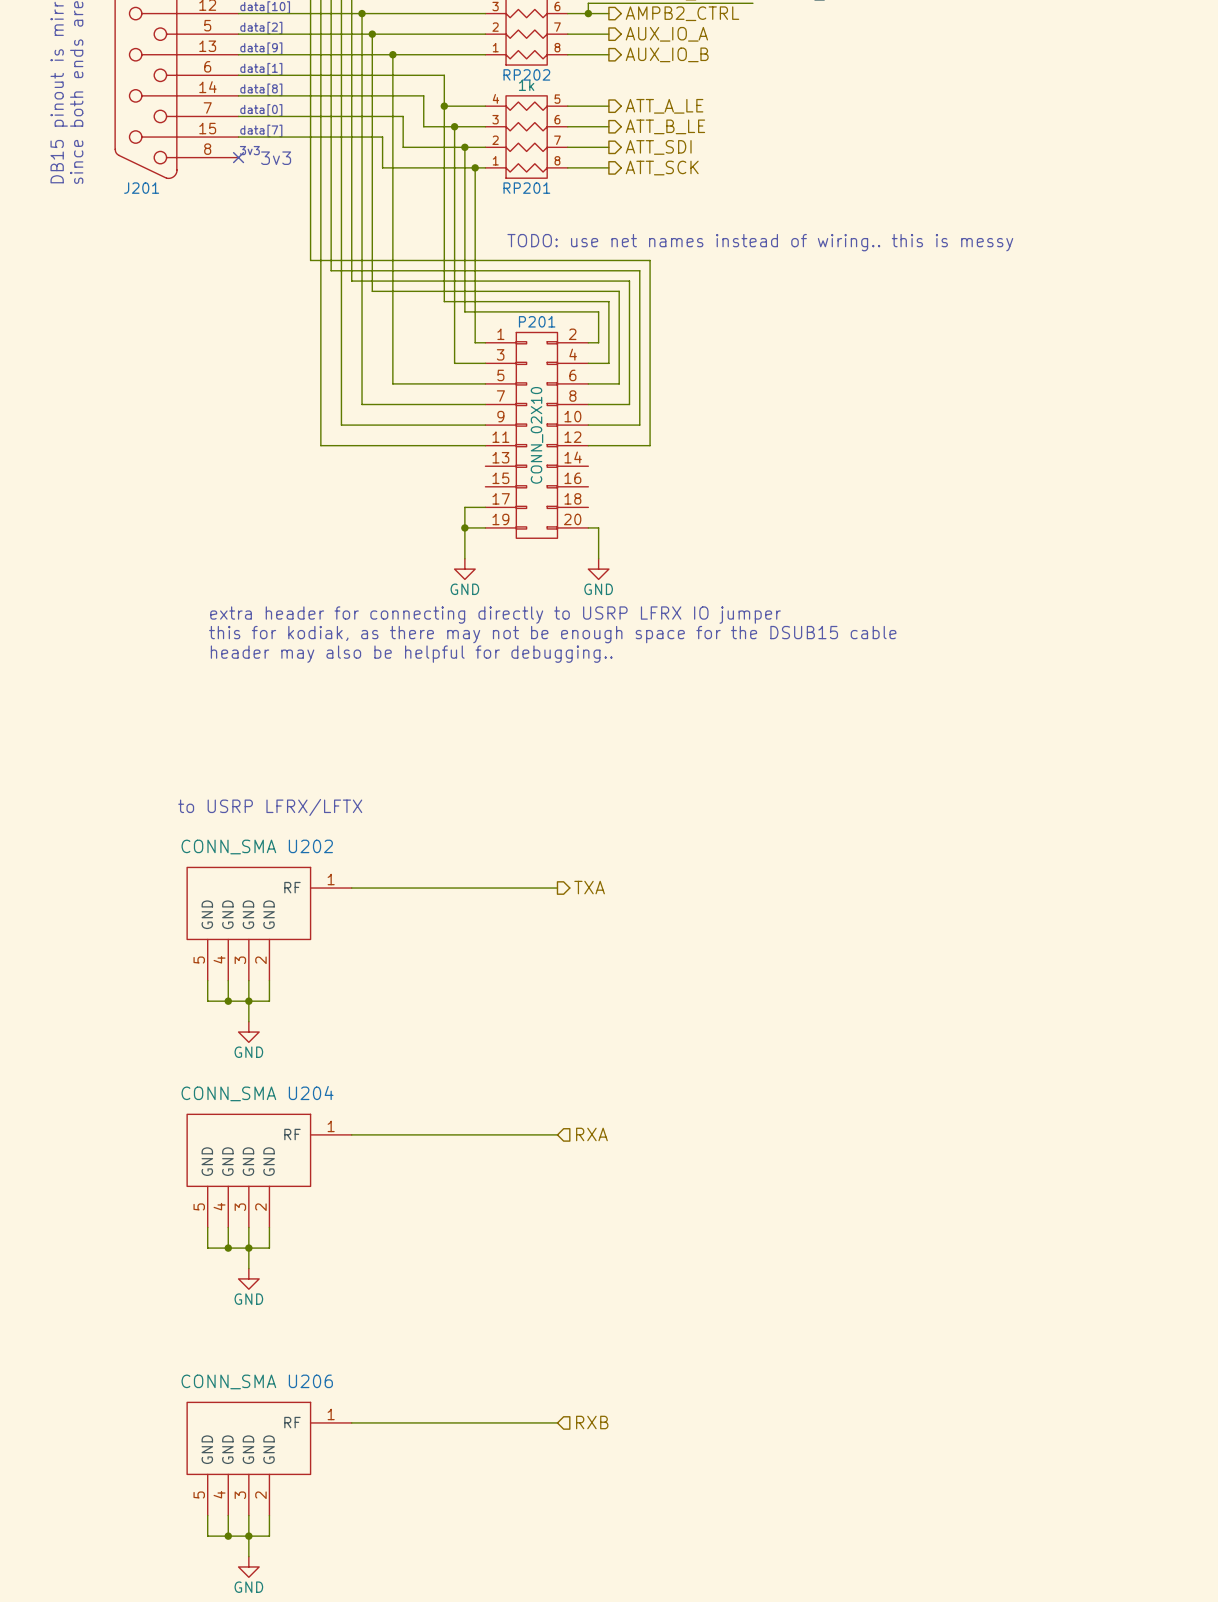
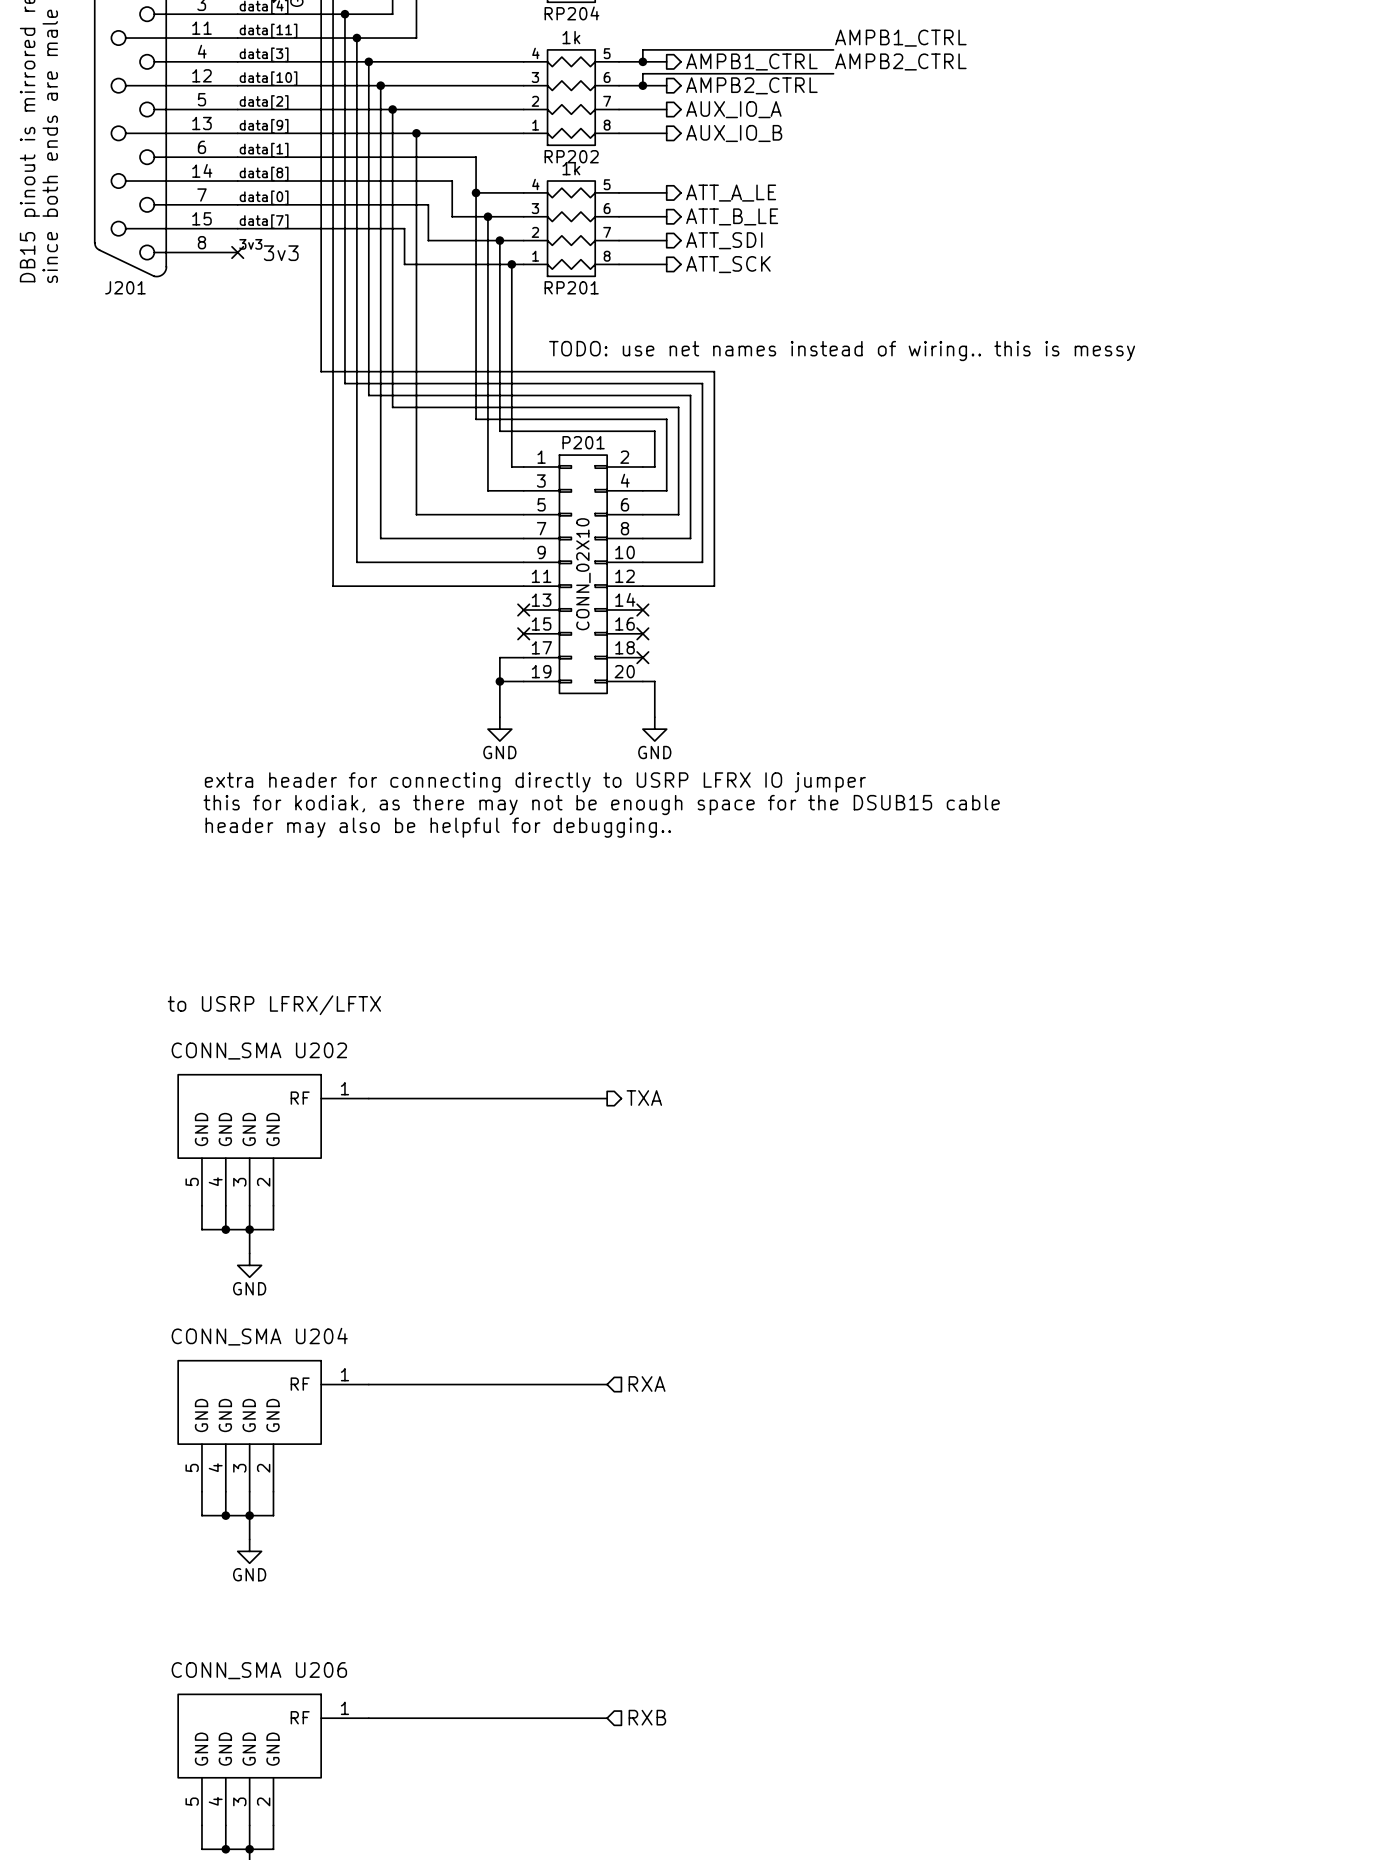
no-connect mark: none -> (523, 609)
no-connect mark: none -> (642, 609)
no-connect mark: none -> (523, 633)
no-connect mark: none -> (642, 633)
no-connect mark: none -> (642, 657)

